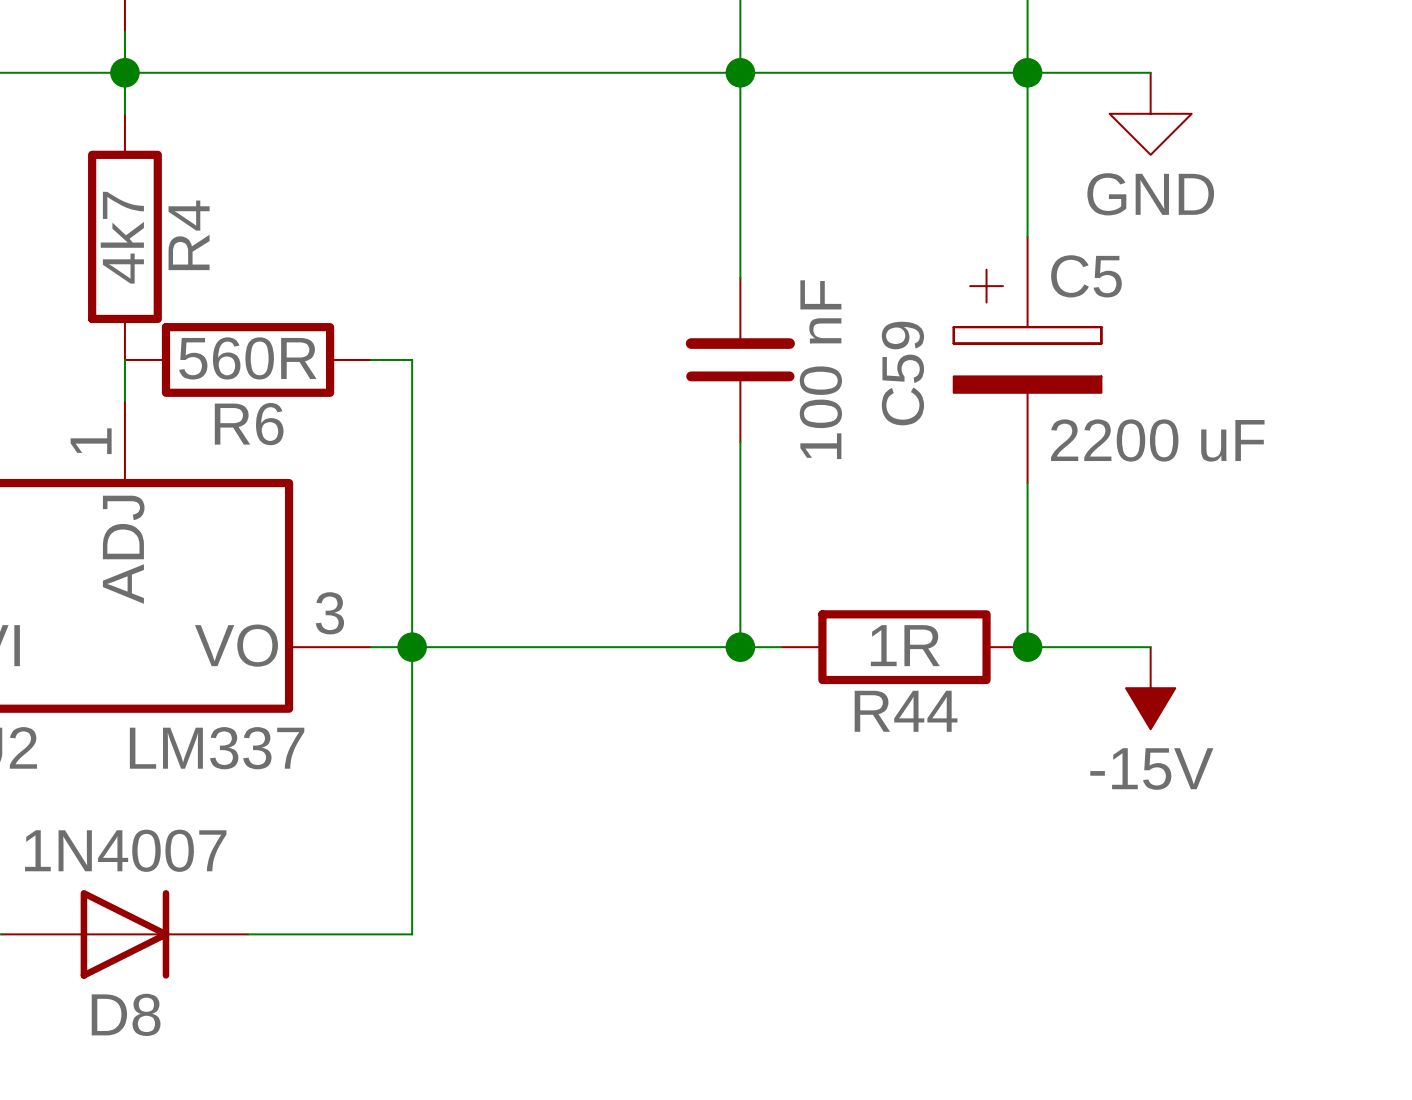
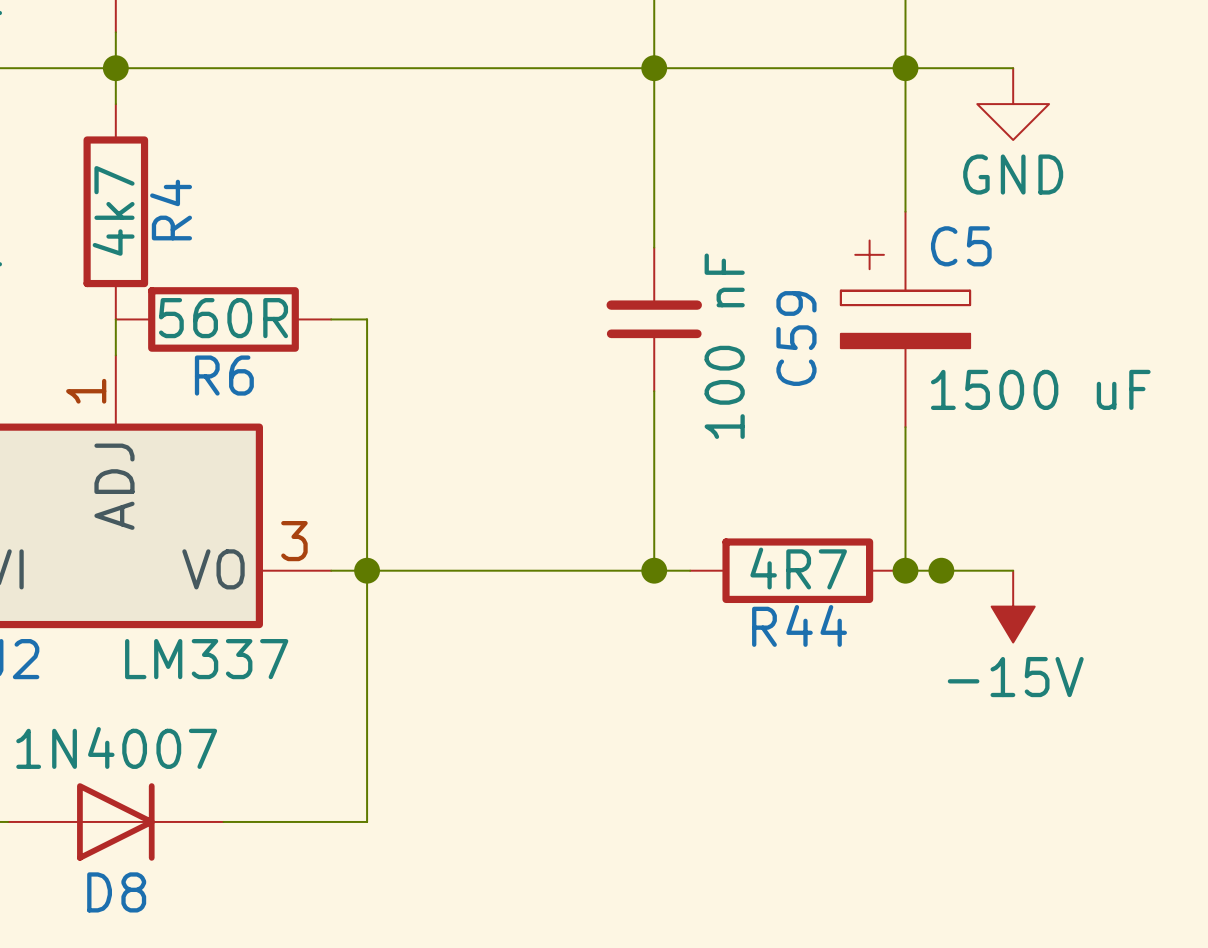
C5 value: 2200 uF (1157, 440) -> 1500 uF (1040, 389)
R44 value: 1R (905, 645) -> 4R7 (798, 568)
junction: none -> (941, 570)

